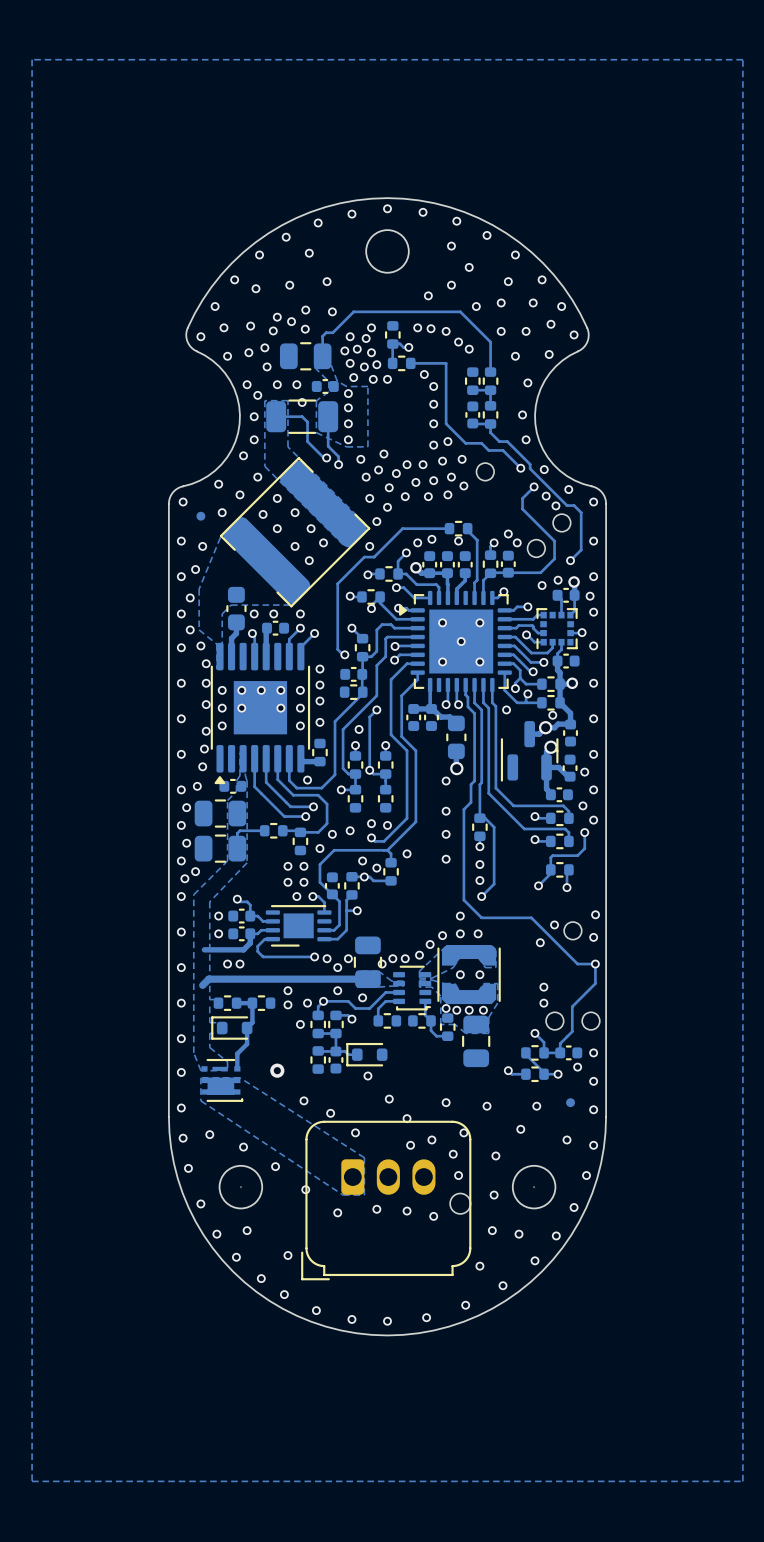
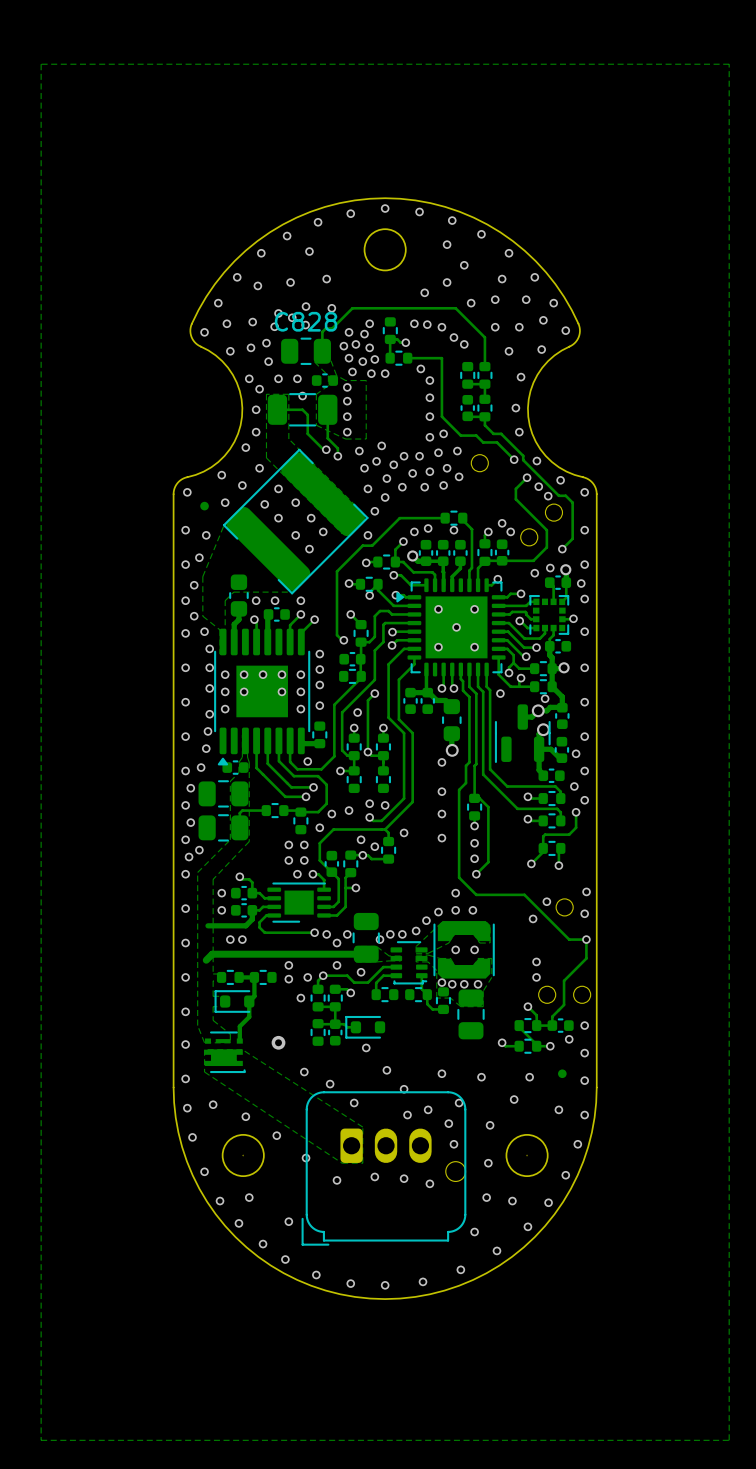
C828 name: none -> C828 (306, 321)

